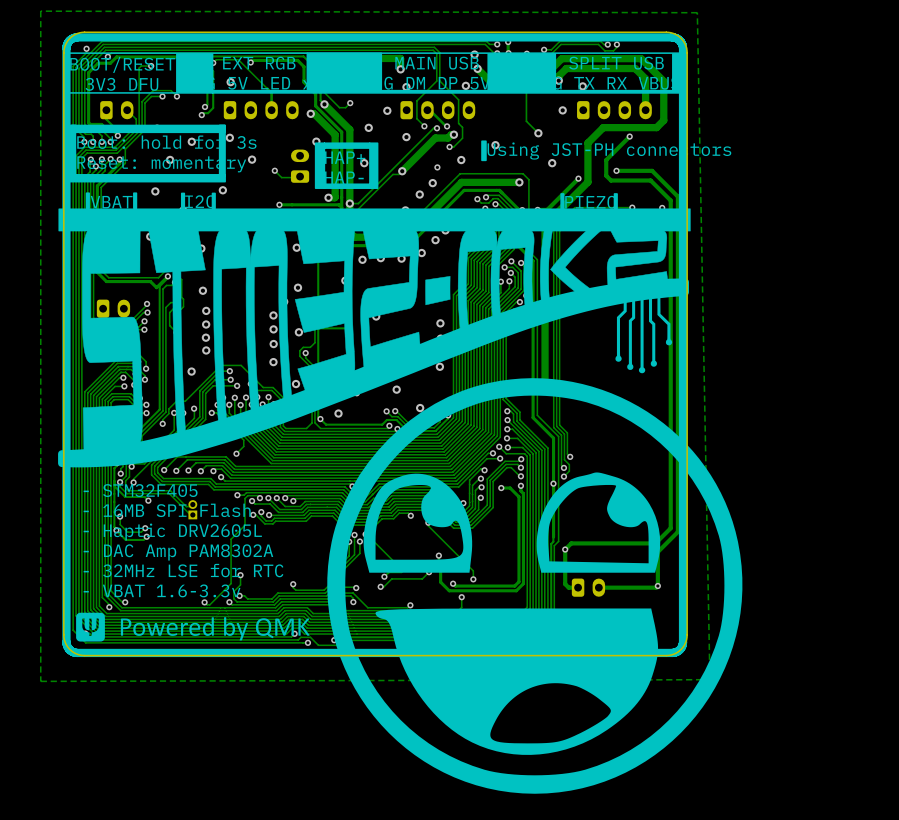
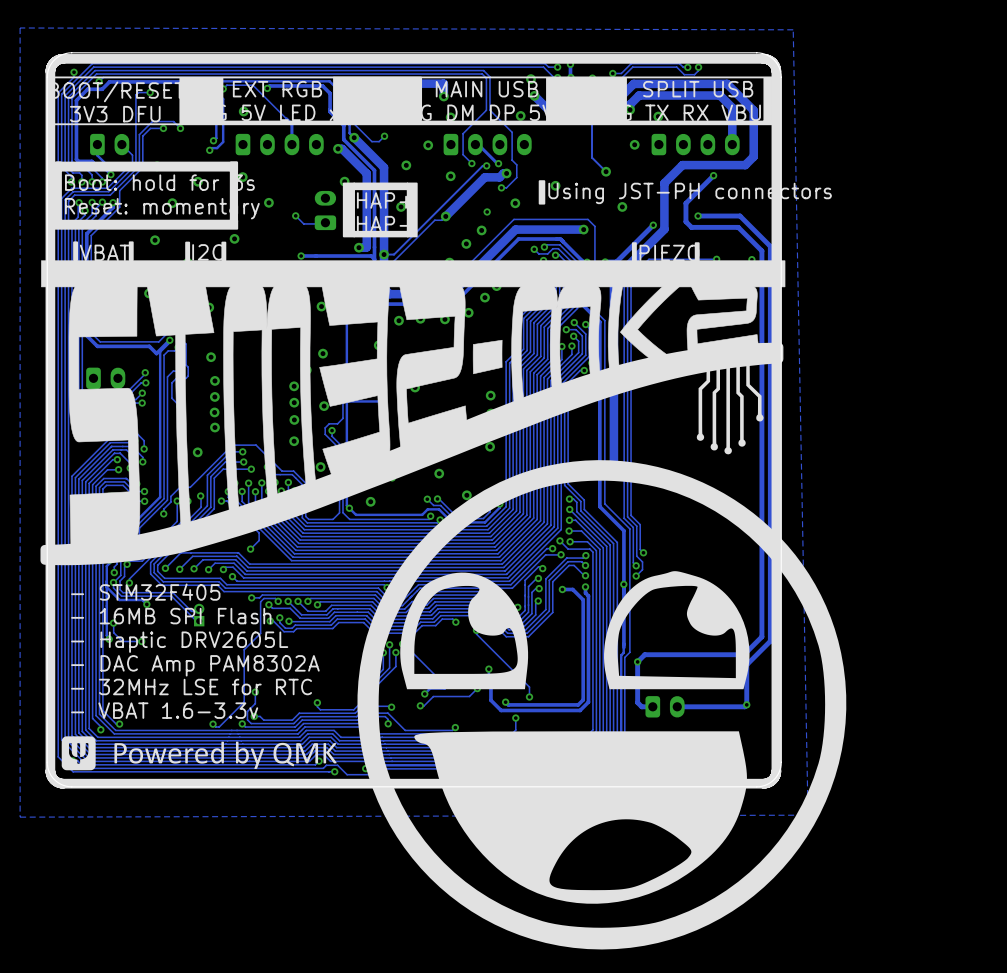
via: (145, 528) -> none
track: (116, 530) (125, 539) (143, 539) (146, 536) -> none
via: none -> (141, 641)
via: (146, 536) -> none

